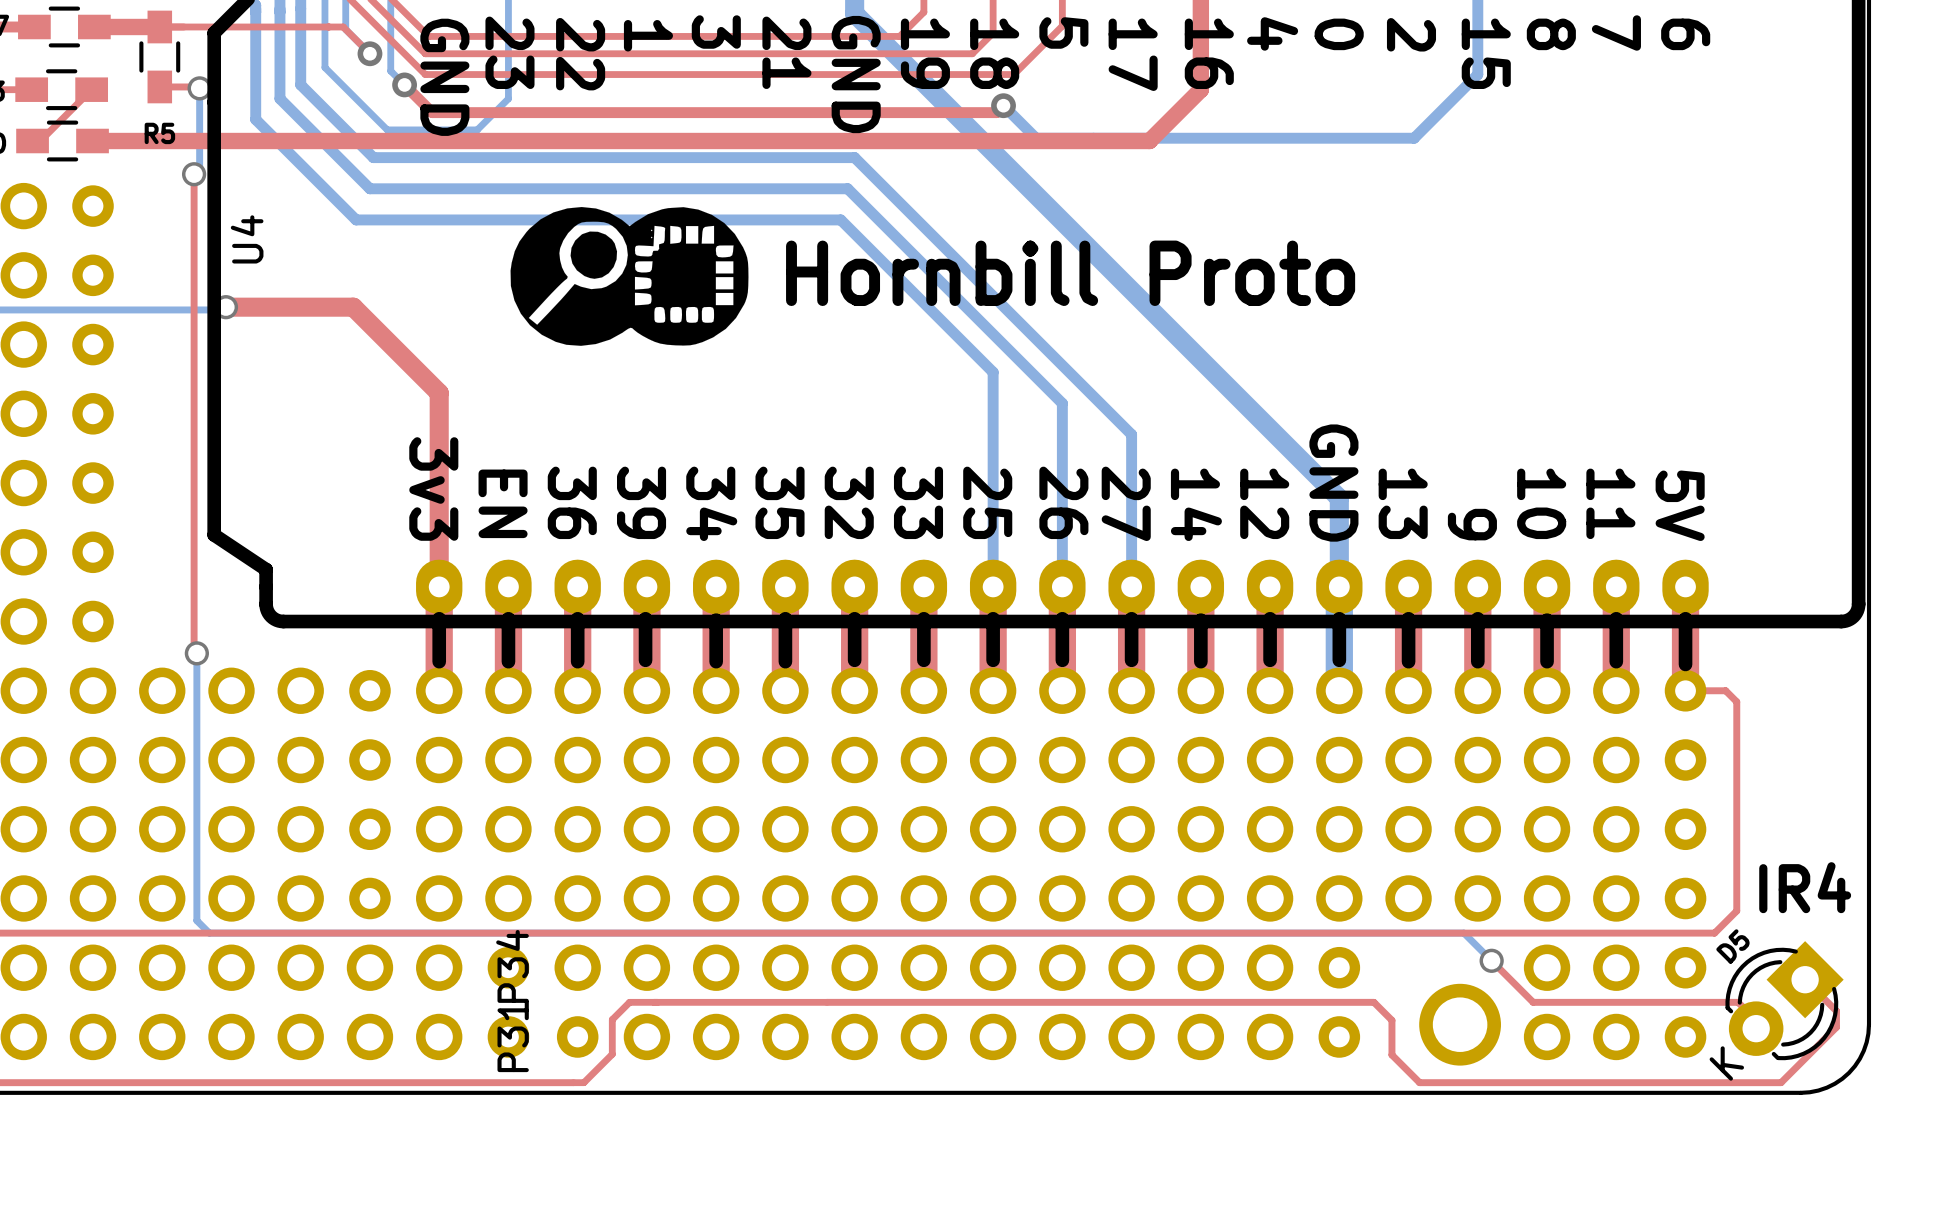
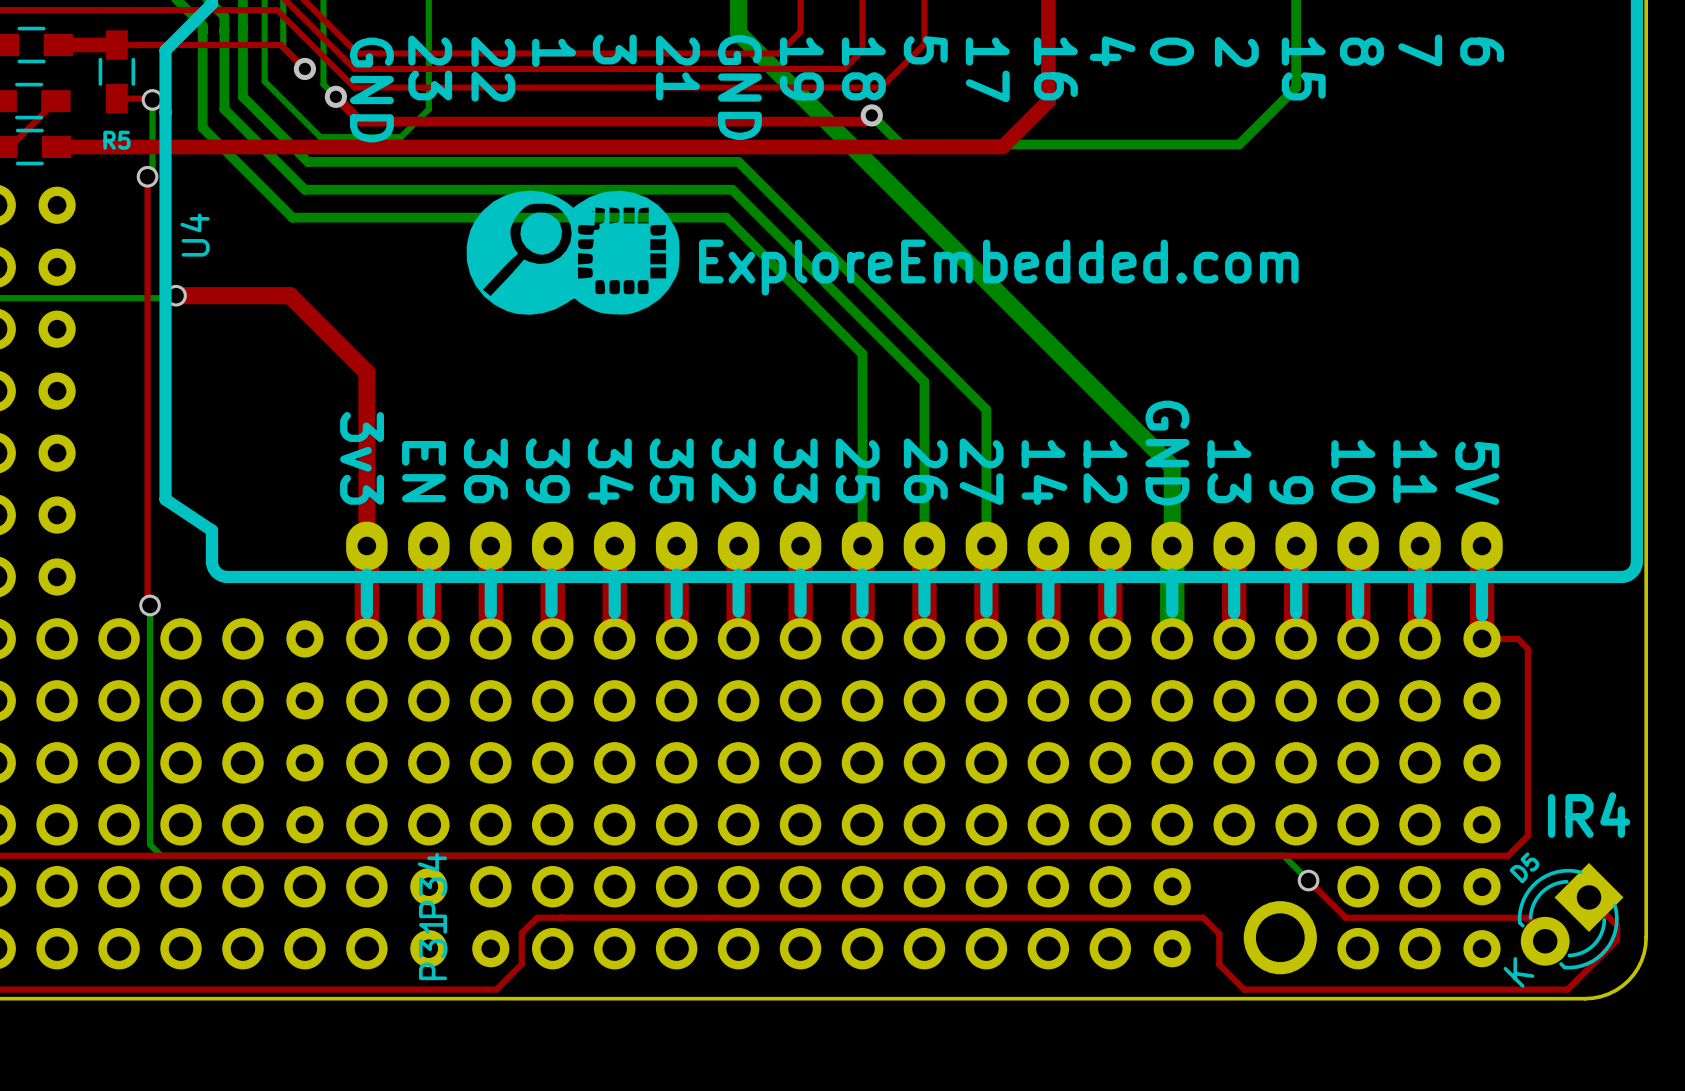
text: Hornbill Proto (1070, 273) -> none
text: none -> ExploreEmbedded.com (998, 267)
drawing position: (629, 276) -> (573, 252)

